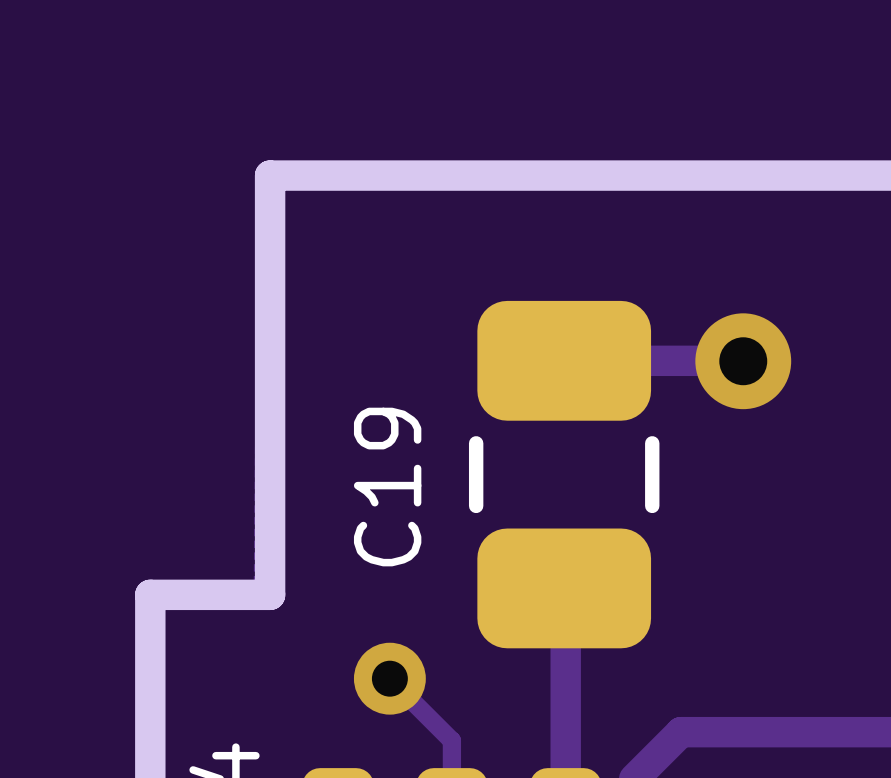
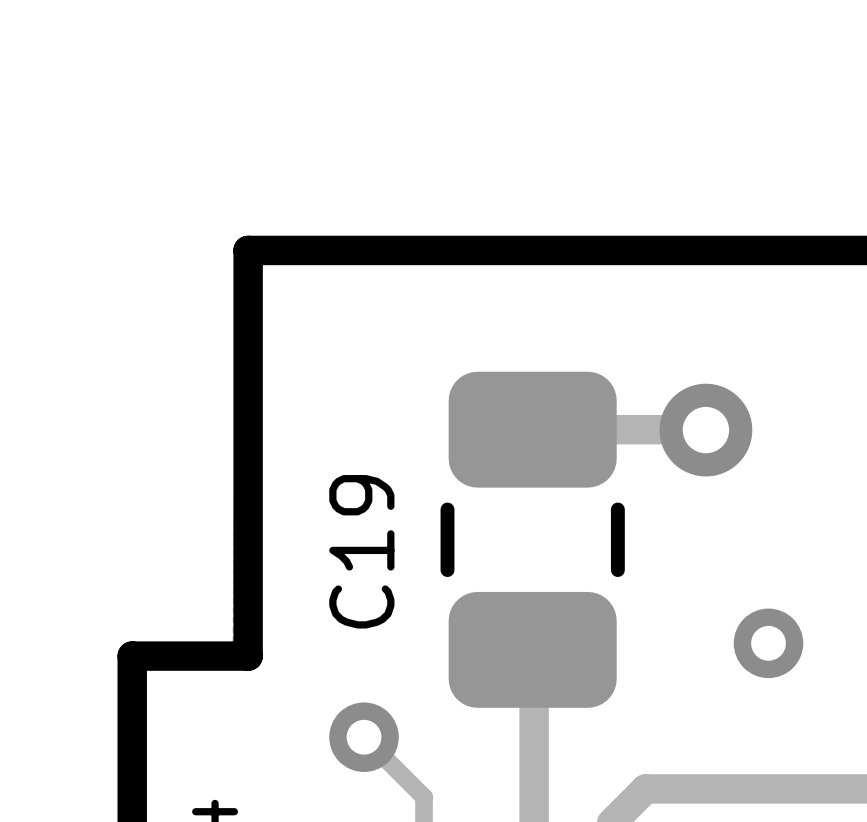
via: none -> (768, 643)

